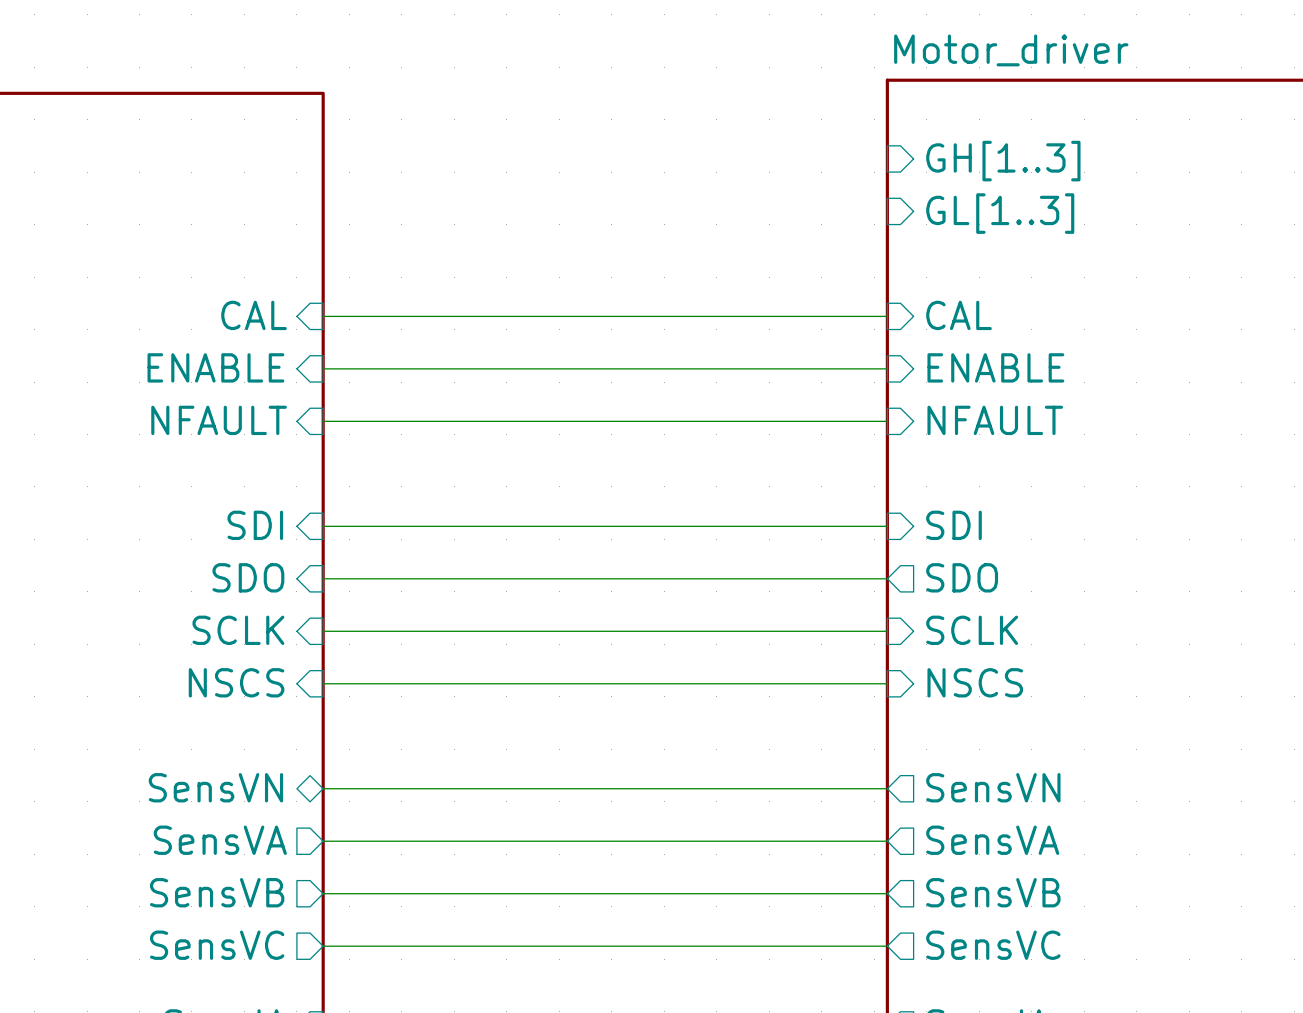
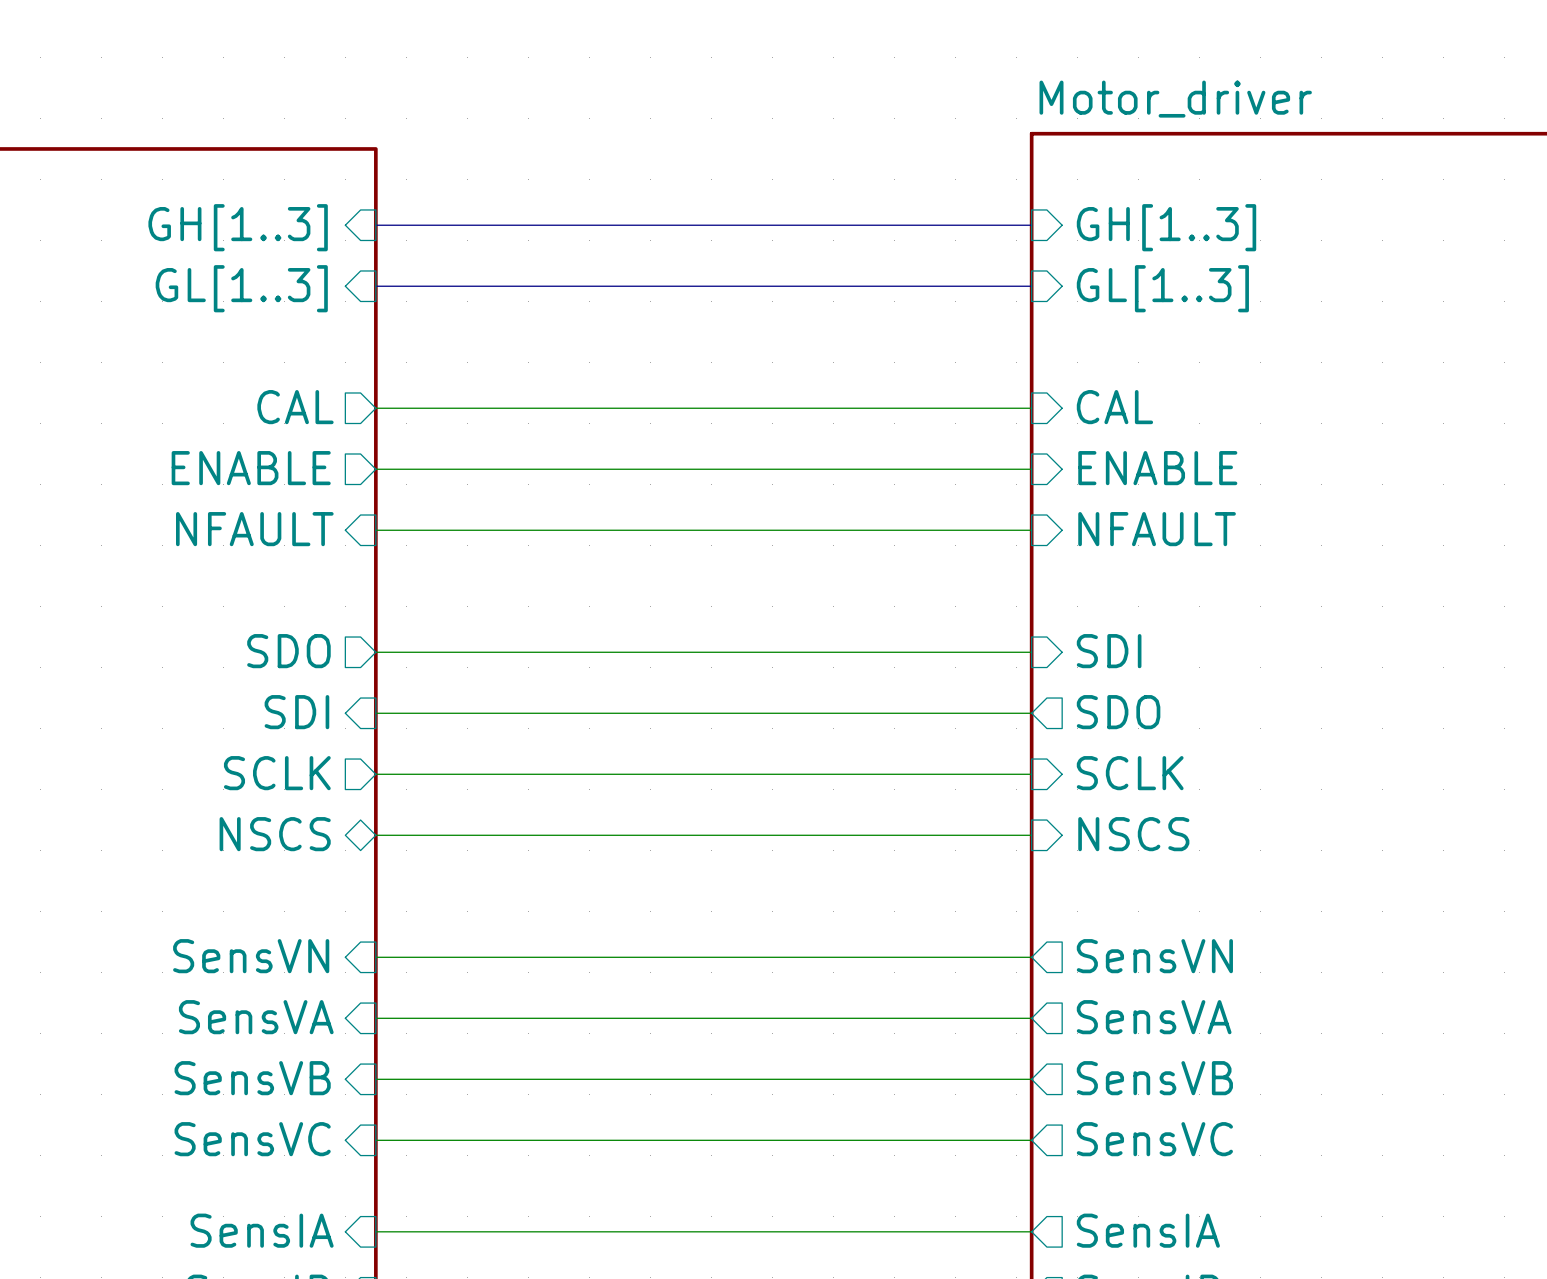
bus: none -> (375, 225) (1031, 225)
sheet pin: none -> GH[1..3] (238, 227)
bus: none -> (375, 286) (1031, 286)
sheet pin: none -> GL[1..3] (241, 288)
sheet pin shape: input (254, 315) -> output (295, 407)
sheet pin shape: input (215, 367) -> output (251, 468)
sheet pin shape: input (255, 525) -> output (288, 651)
sheet pin: SDI (255, 525) -> SDO (288, 651)
sheet pin: SDO (248, 577) -> SDI (296, 712)
sheet pin shape: input (238, 630) -> output (277, 773)
sheet pin shape: input (236, 682) -> bidirectional (275, 834)
sheet pin shape: bidirectional (215, 787) -> input (251, 956)
sheet pin shape: output (220, 840) -> input (256, 1017)
sheet pin shape: output (217, 892) -> input (252, 1078)
sheet pin shape: output (217, 945) -> input (252, 1139)

